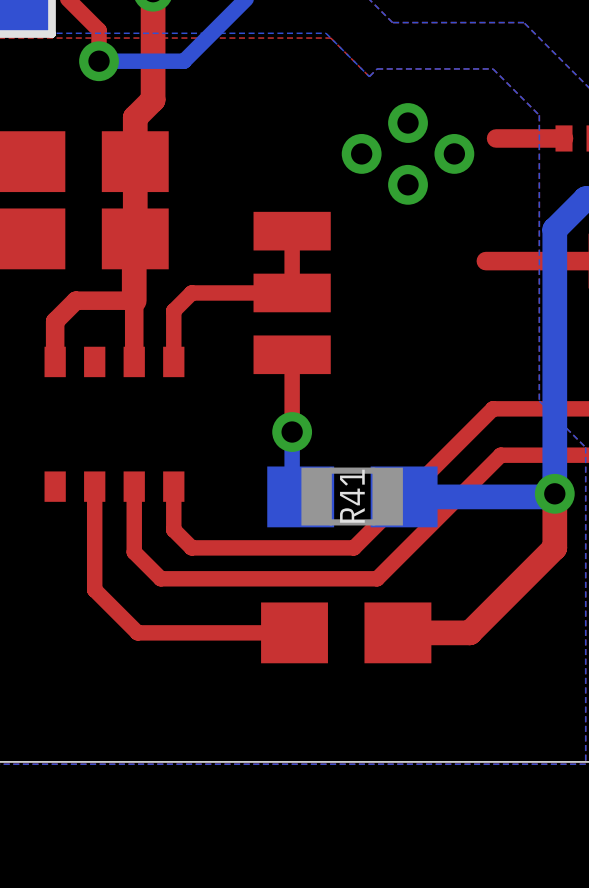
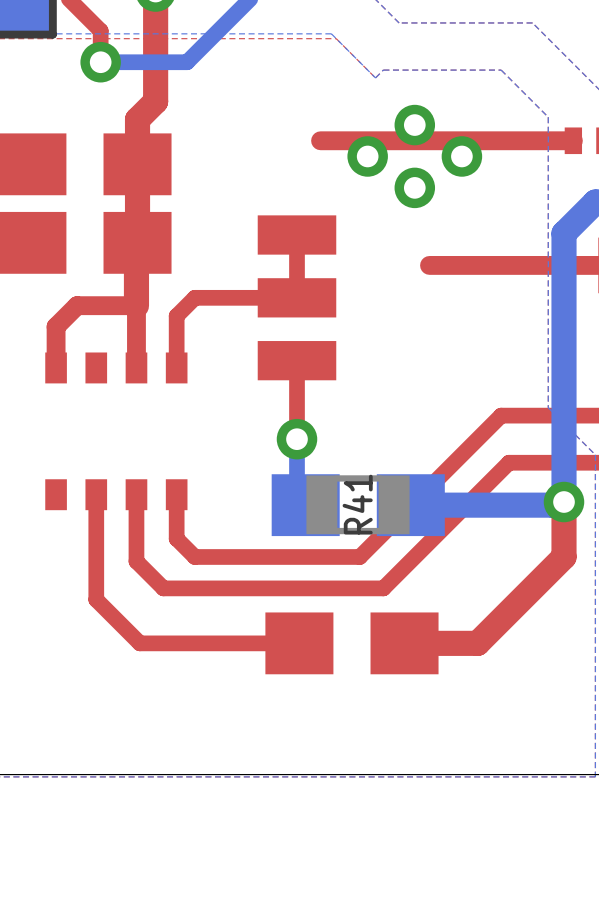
top track: none -> (504, 140) (320, 140)
top track: none -> (493, 265) (429, 265)

